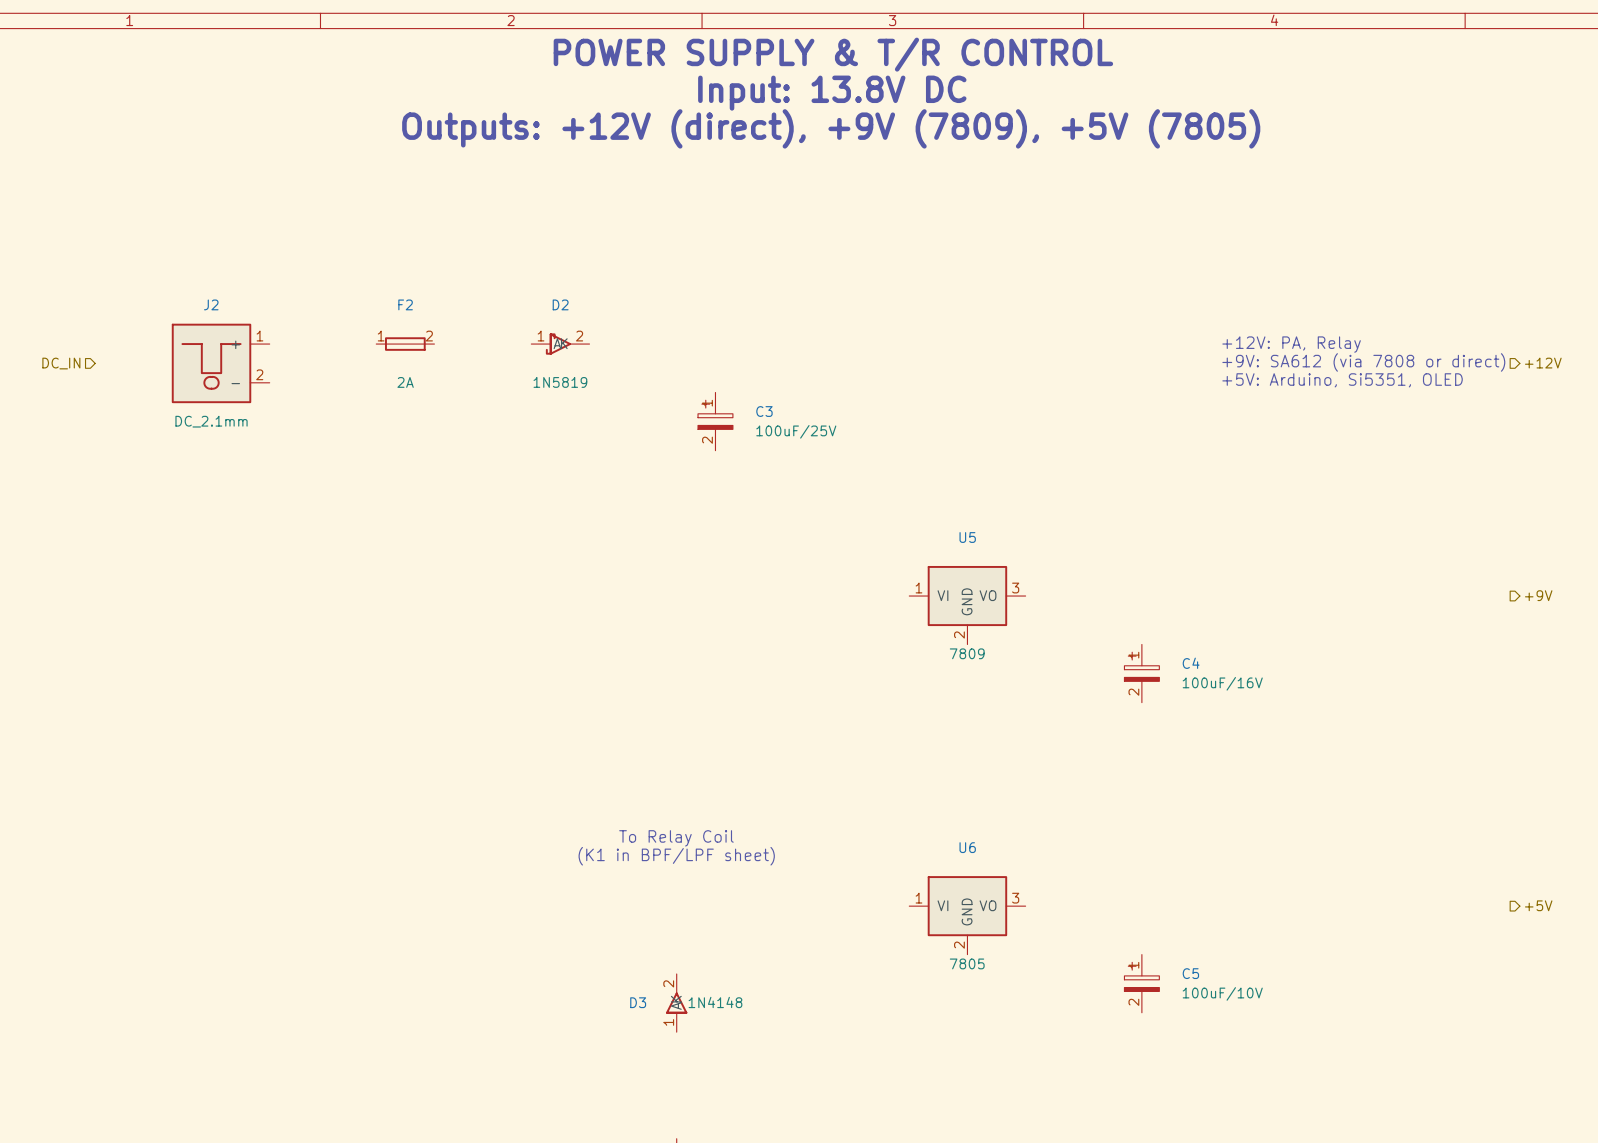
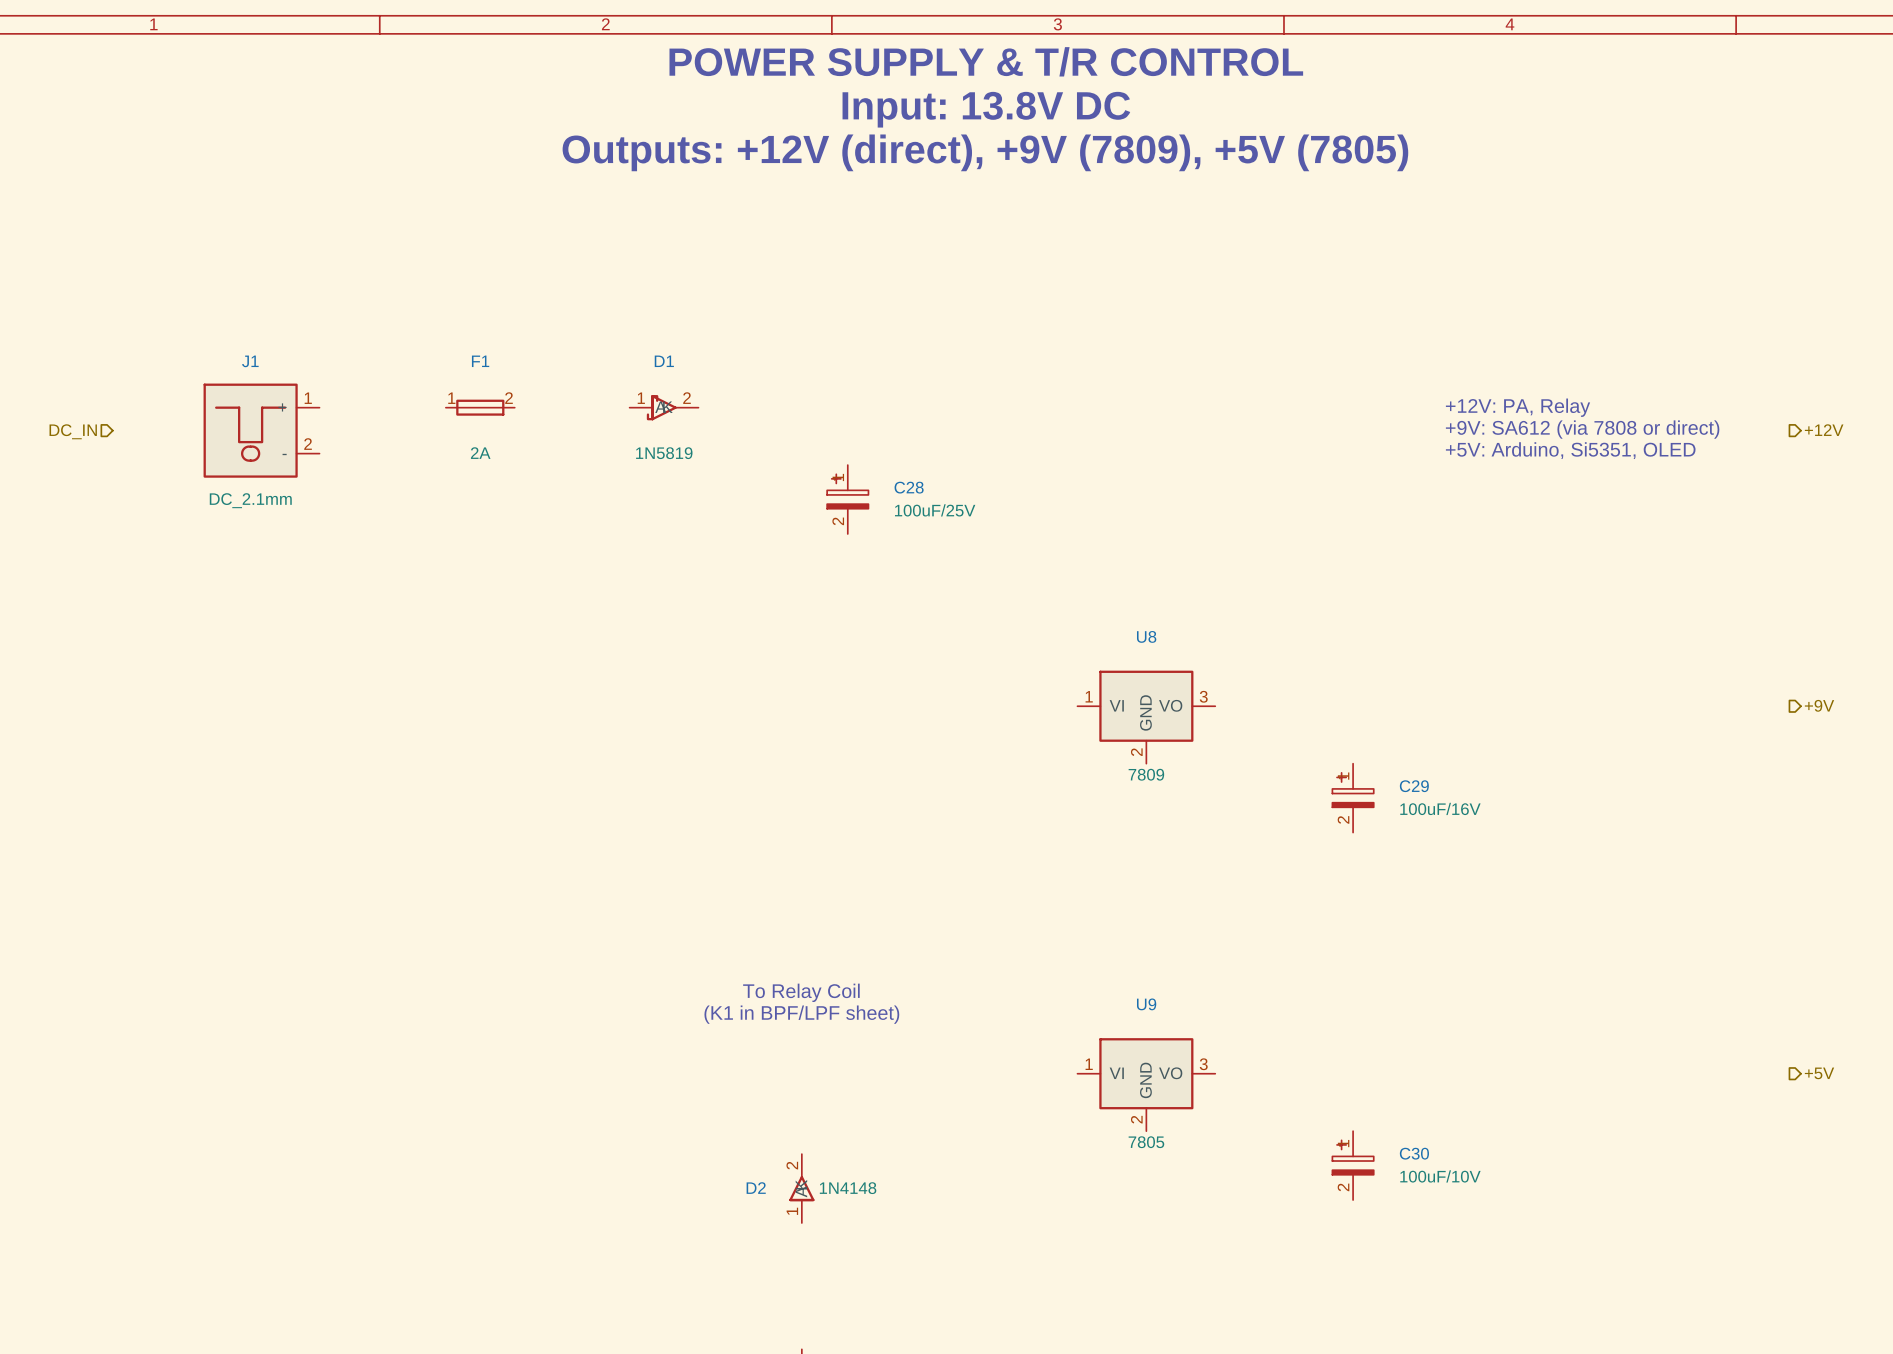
J2 name: J2 (211, 304) -> J1 (250, 361)
F2 name: F2 (405, 304) -> F1 (480, 361)
D2 name: D2 (560, 304) -> D1 (664, 361)
C3 name: C3 (764, 411) -> C28 (909, 487)
U5 name: U5 (967, 537) -> U8 (1146, 636)
C4 name: C4 (1191, 663) -> C29 (1414, 786)
U6 name: U6 (967, 847) -> U9 (1146, 1004)
C5 name: C5 (1190, 973) -> C30 (1414, 1153)
D3 name: D3 (638, 1002) -> D2 (756, 1188)

